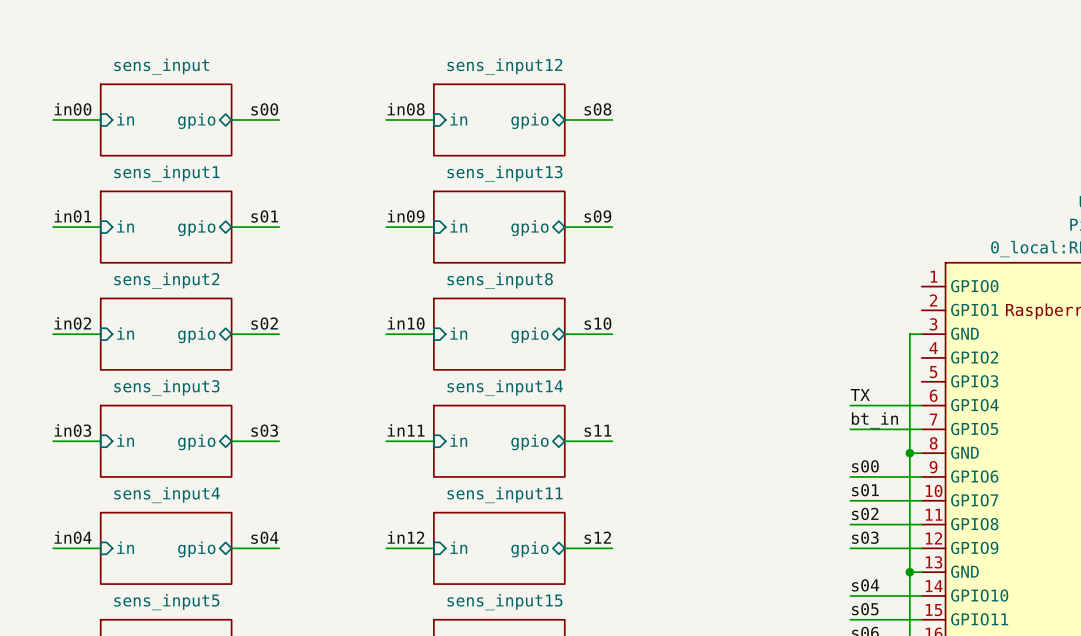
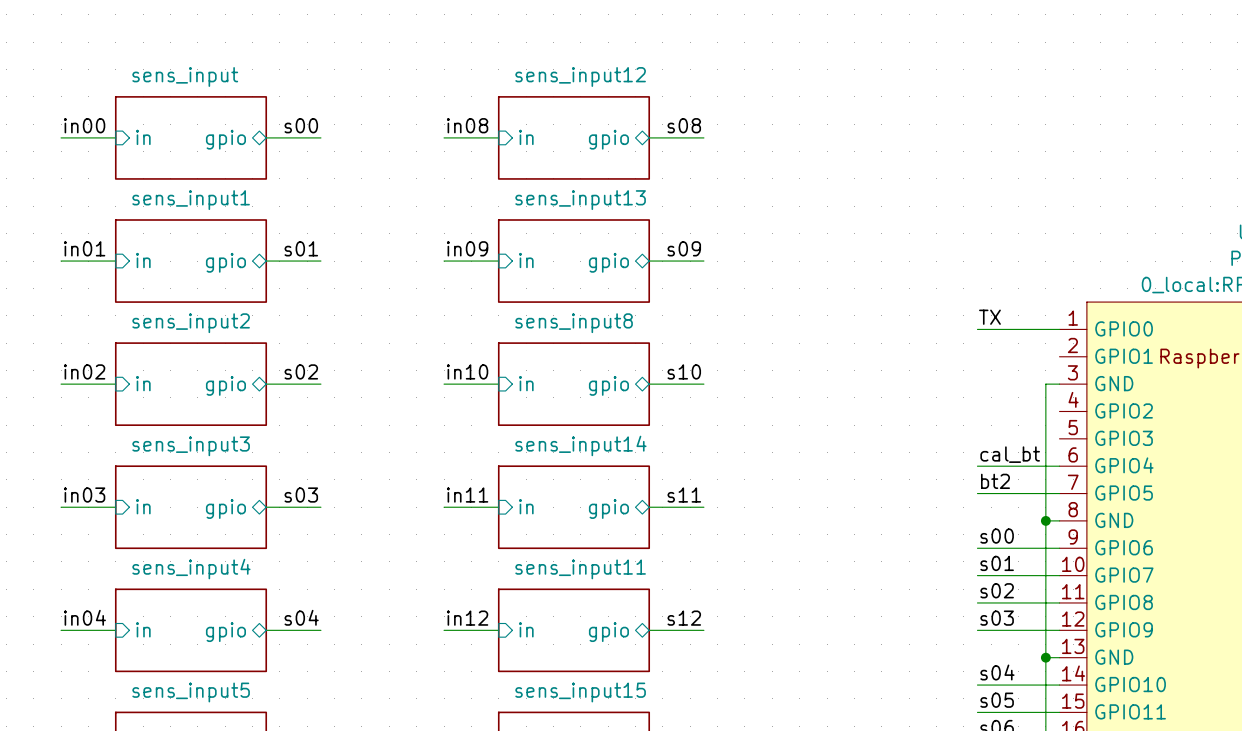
label: none -> TX (989, 317)
wire: none -> (977, 329) (1059, 329)
label: TX (860, 394) -> cal_bt (1010, 454)
label: bt_in (874, 420) -> bt2 (995, 481)

